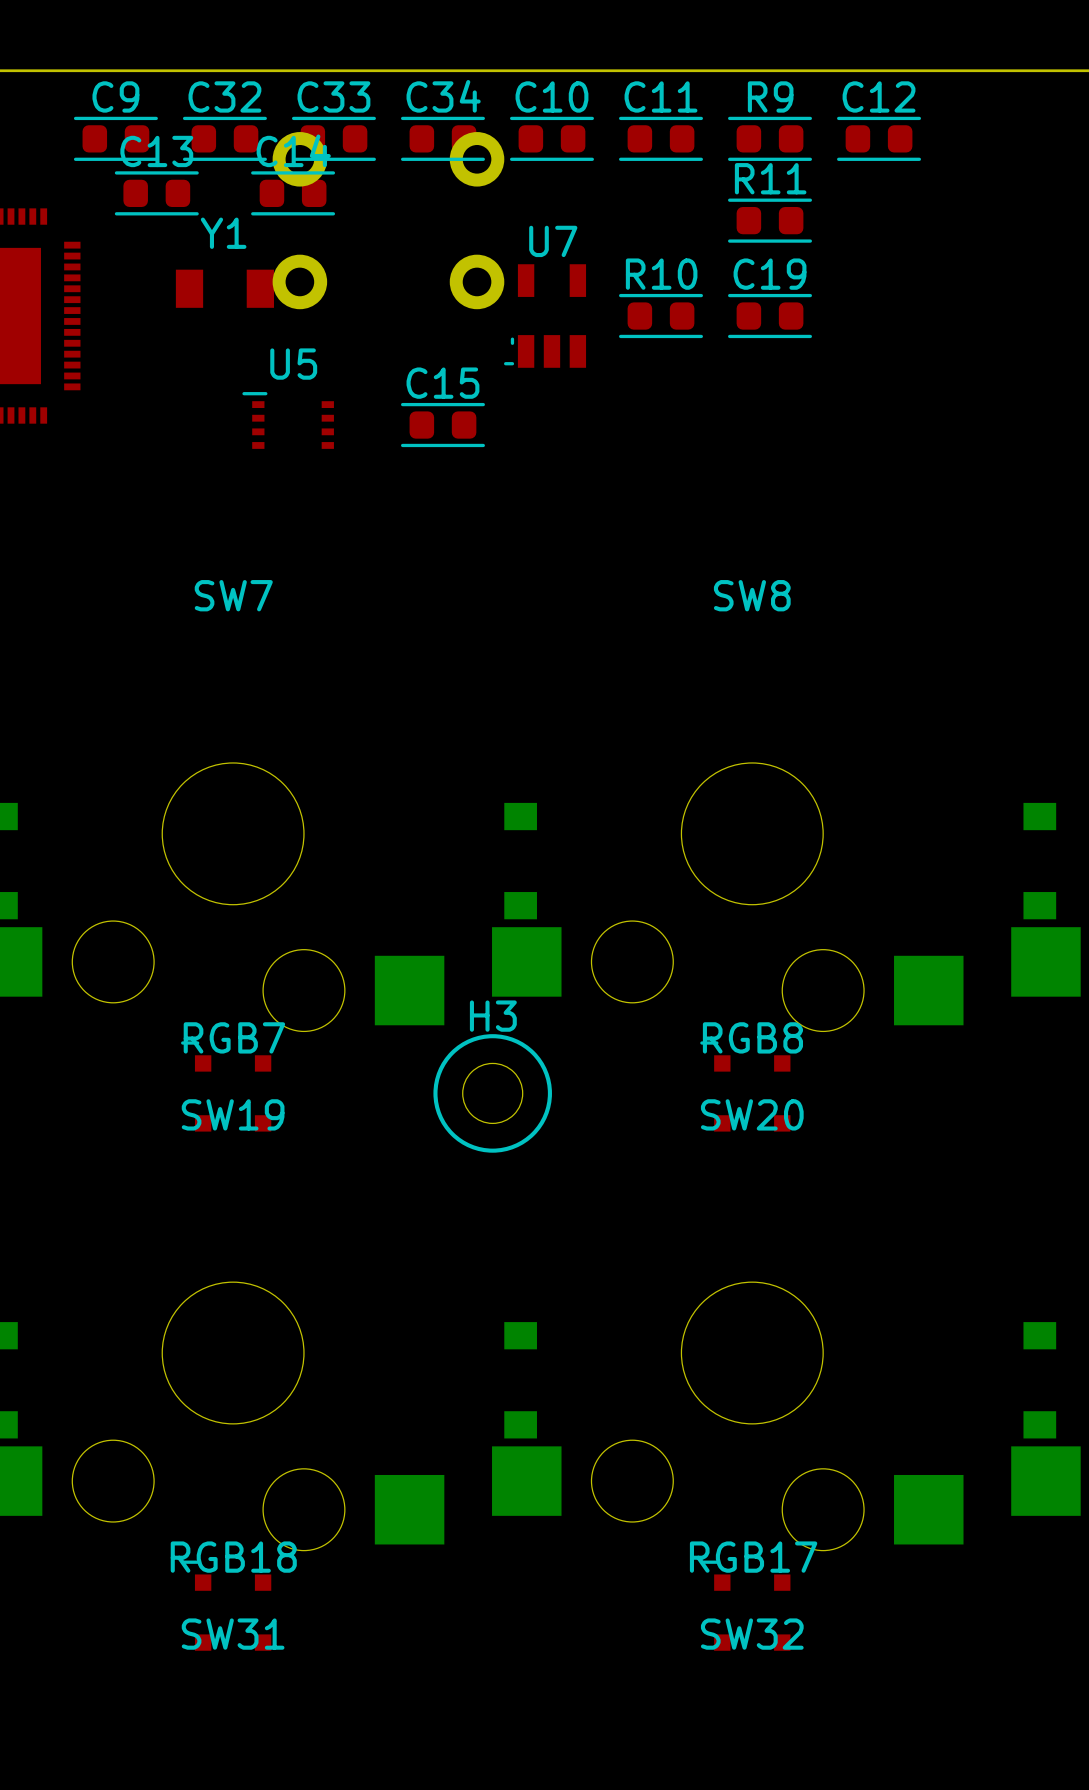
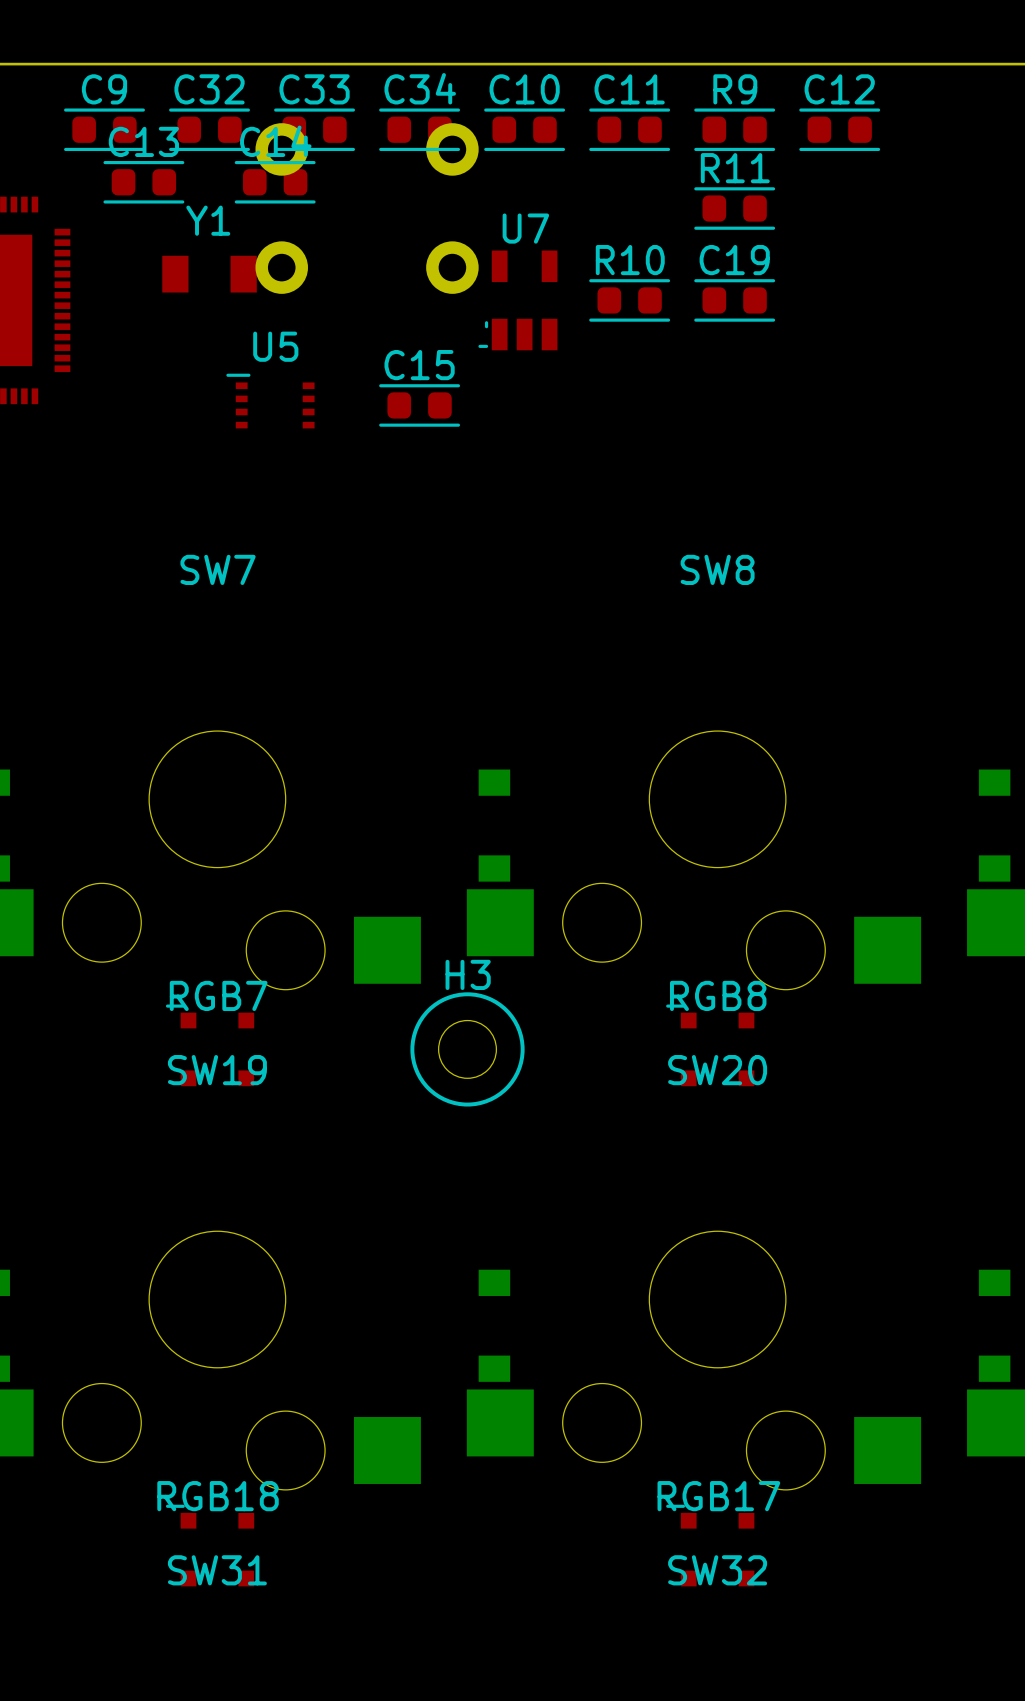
RGB7 footprint: [181, 1041, 272, 1132] -> [165, 1004, 255, 1087]
RGB8 footprint: [700, 1041, 791, 1132] -> [666, 1004, 755, 1087]
RGB18 footprint: [181, 1560, 272, 1651] -> [165, 1504, 255, 1587]
RGB17 footprint: [700, 1560, 791, 1651] -> [666, 1504, 755, 1587]

